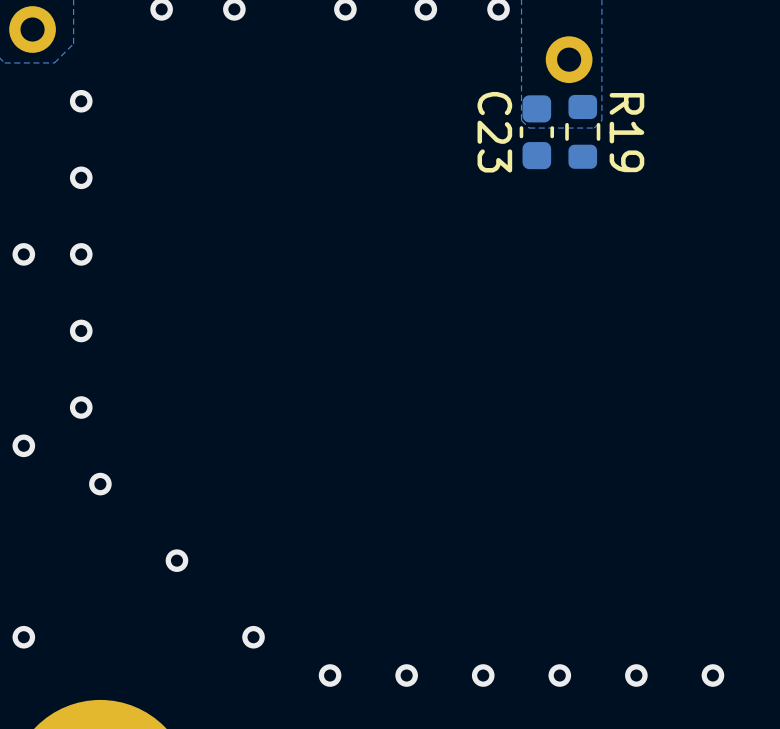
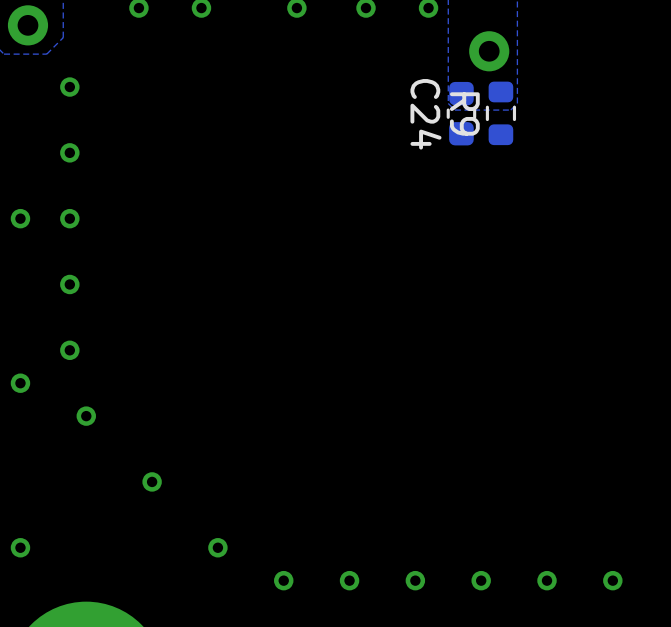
C23 name: C23 (494, 132) -> C24 (425, 114)
R19 name: R19 (626, 132) -> R9 (464, 113)

